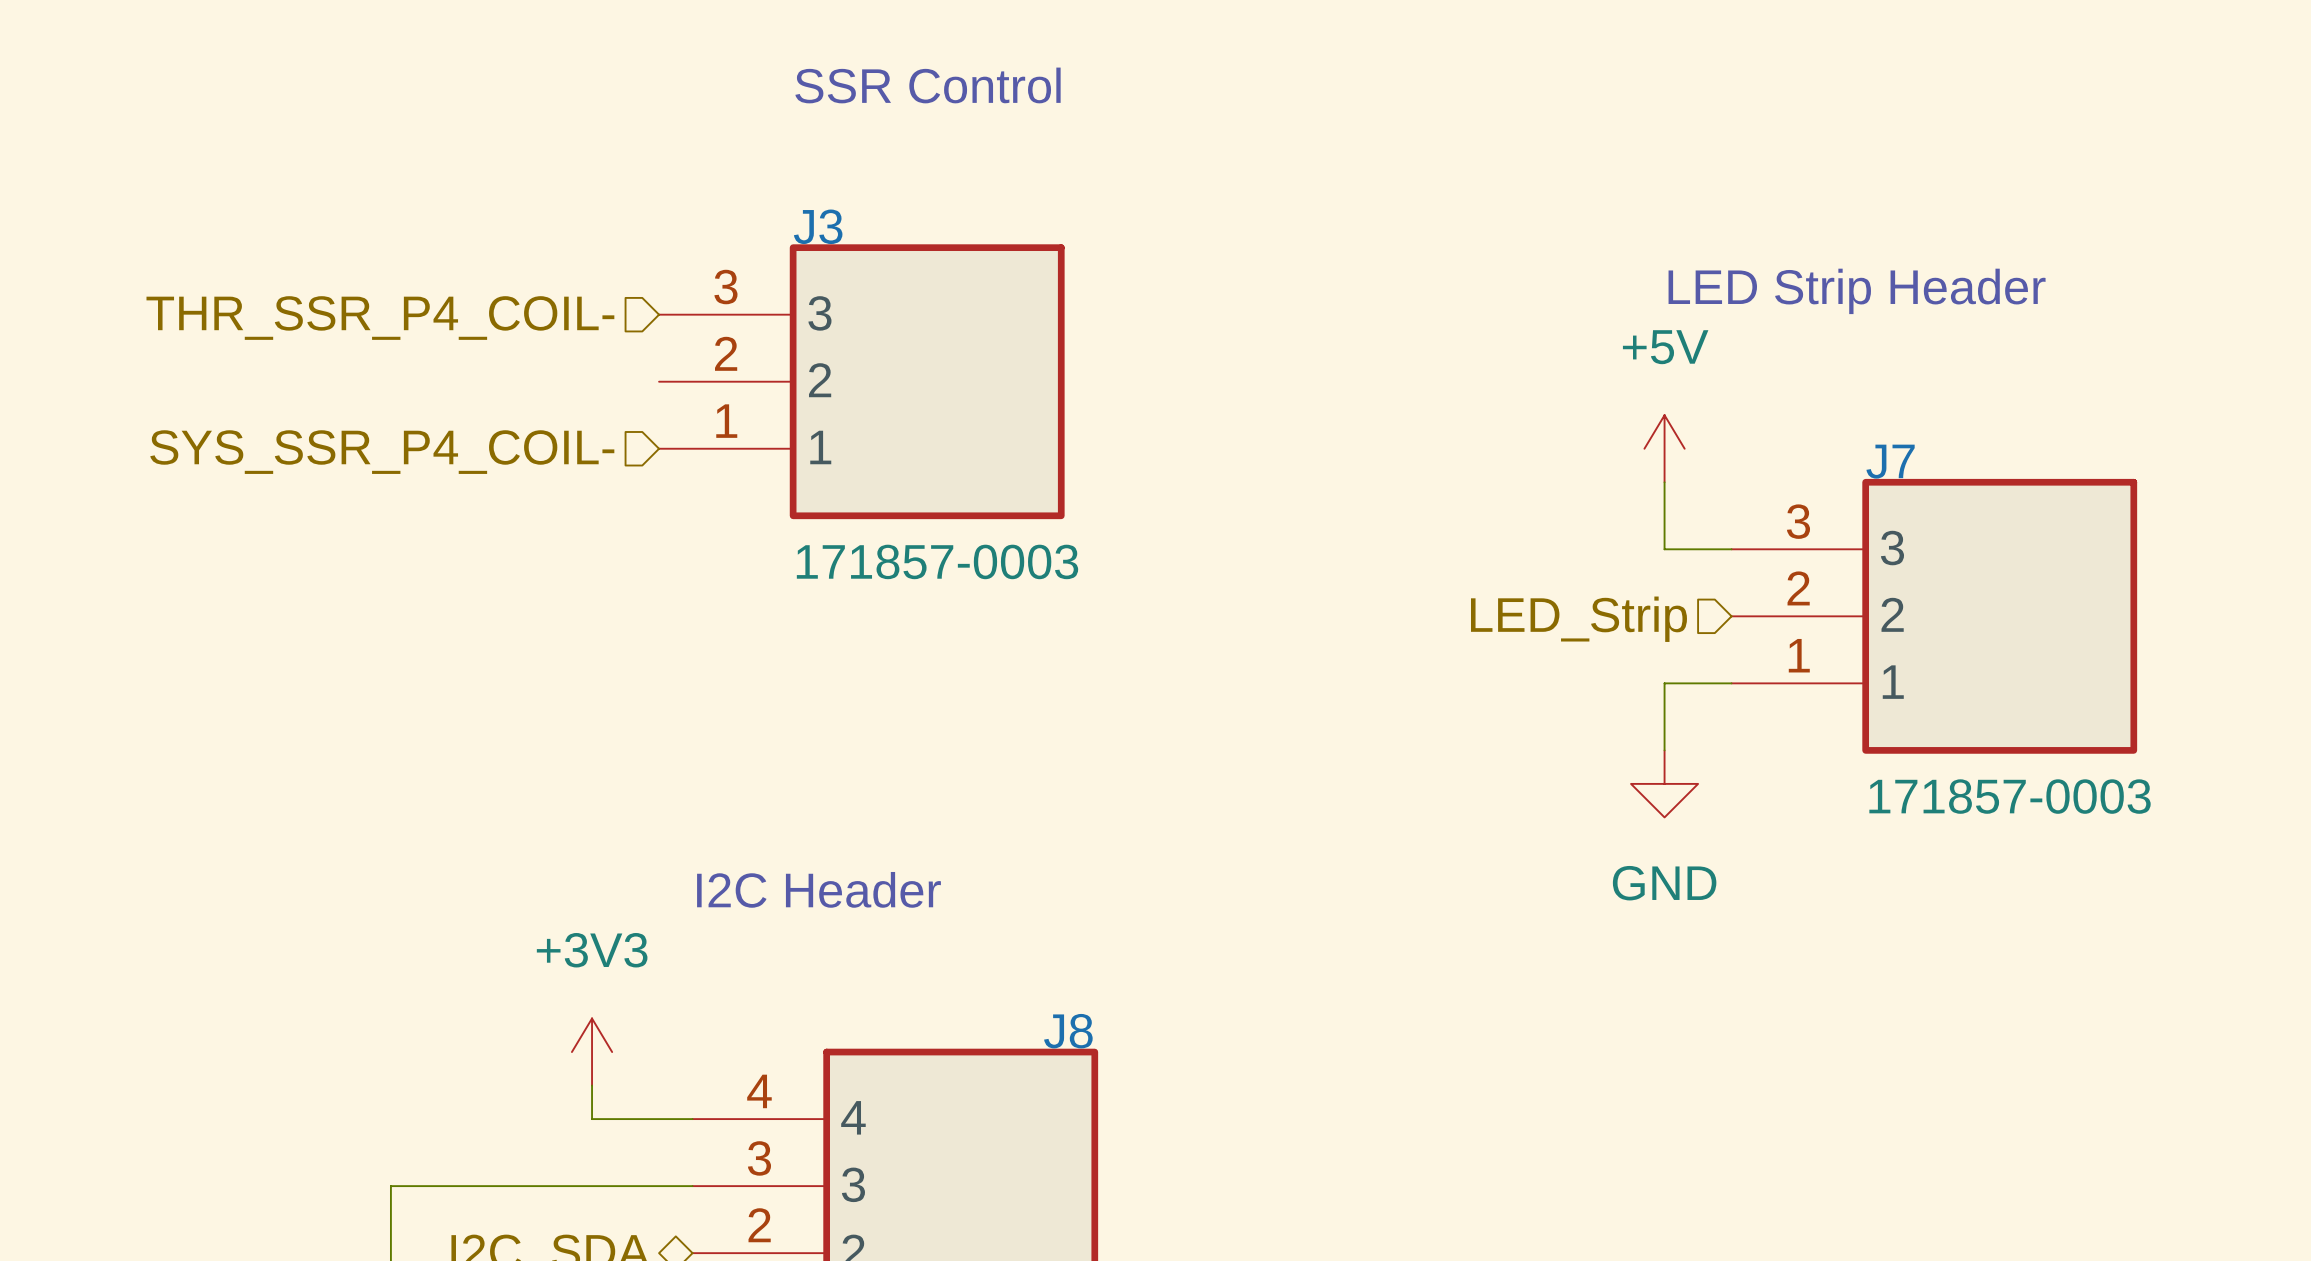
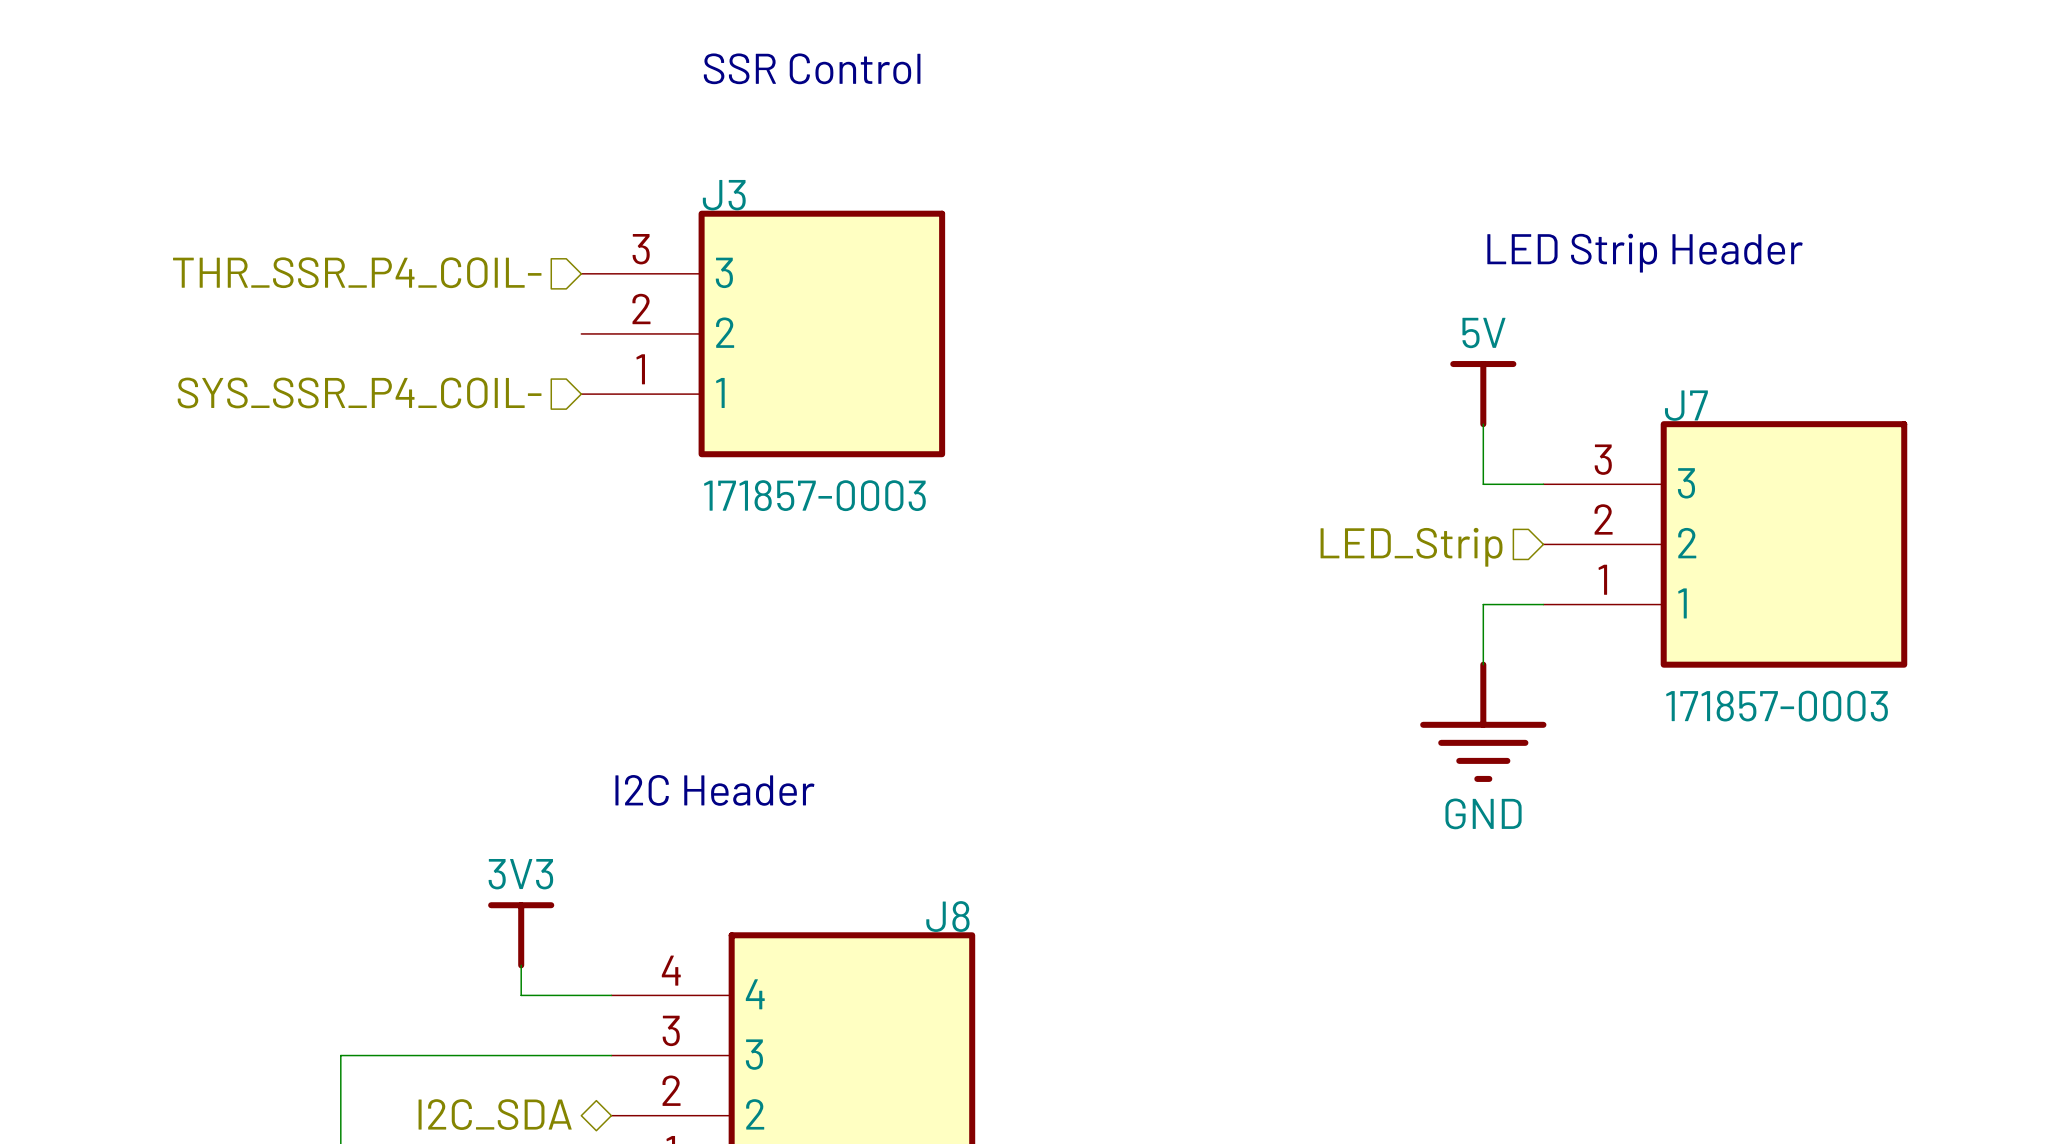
power symbol: +5V (1664, 448) -> 5V (1483, 394)
power symbol: GND (1664, 783) -> none
power symbol: none -> GND (1483, 721)
power symbol: +3V3 (592, 1052) -> 3V3 (521, 935)

